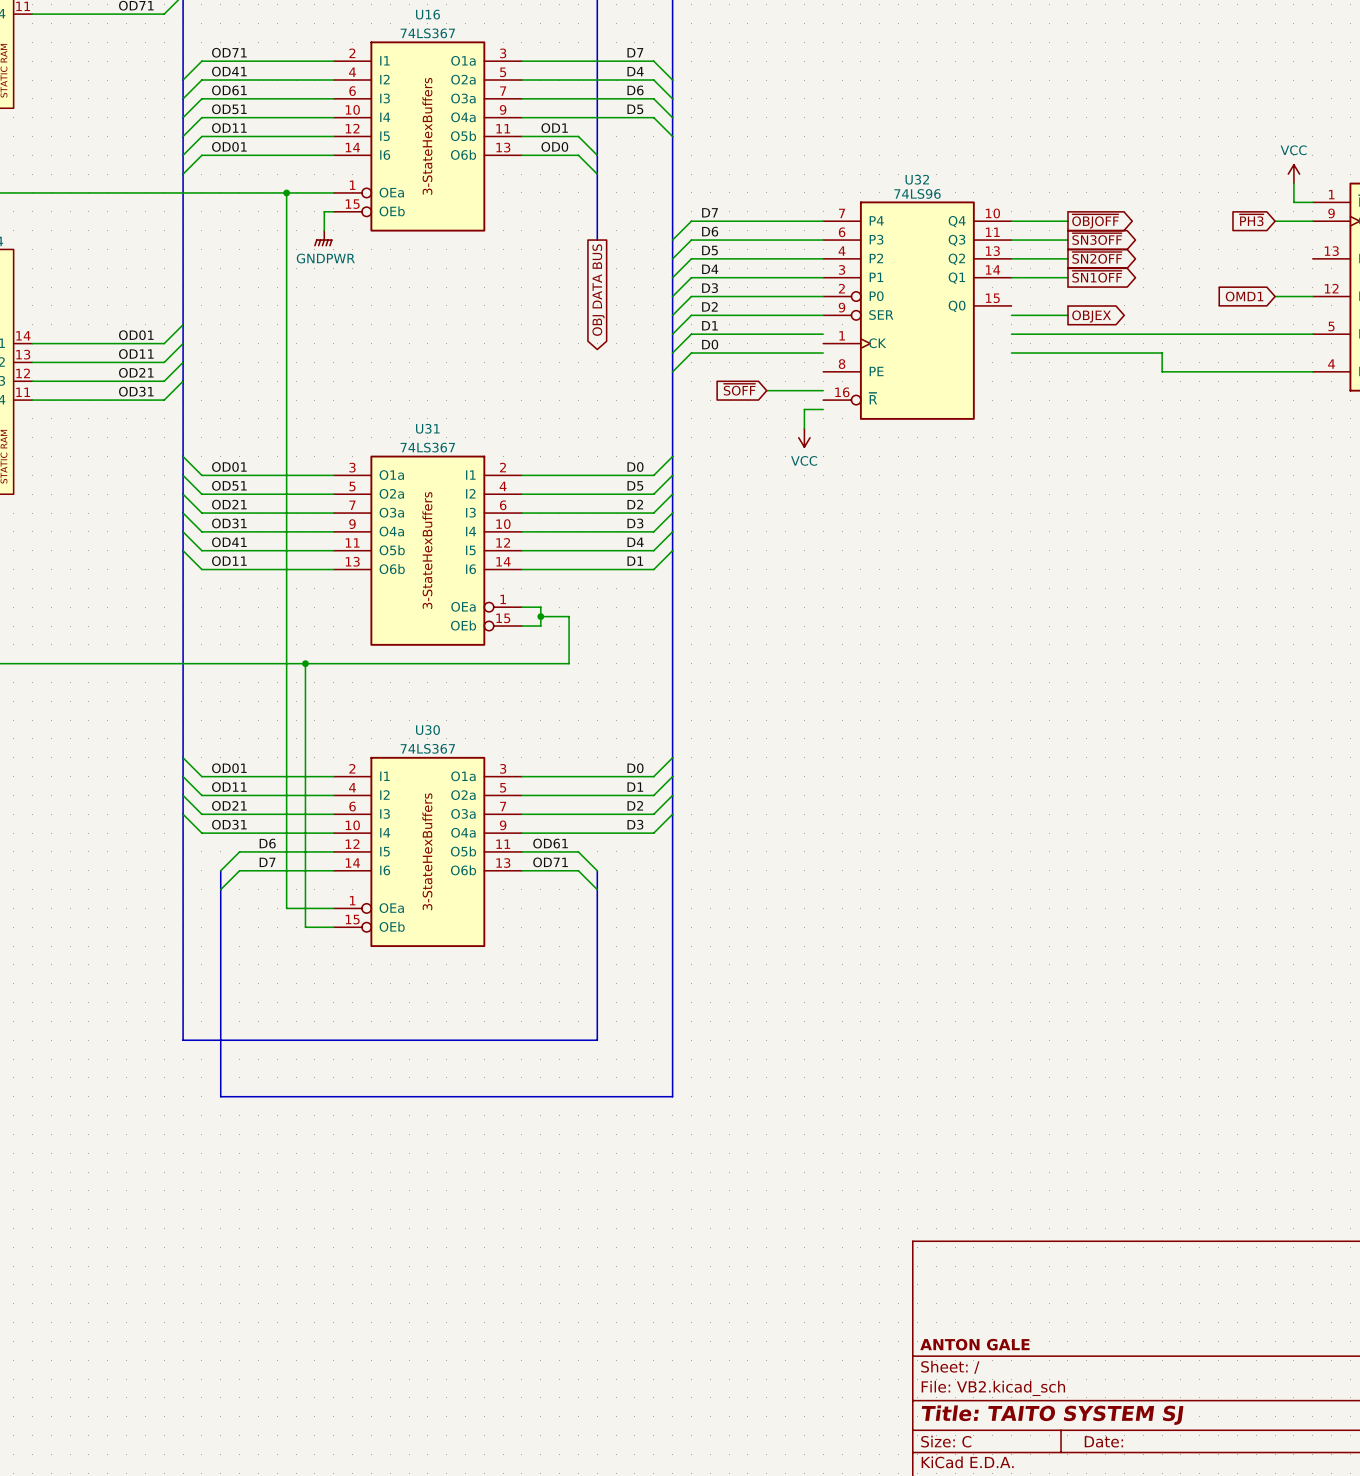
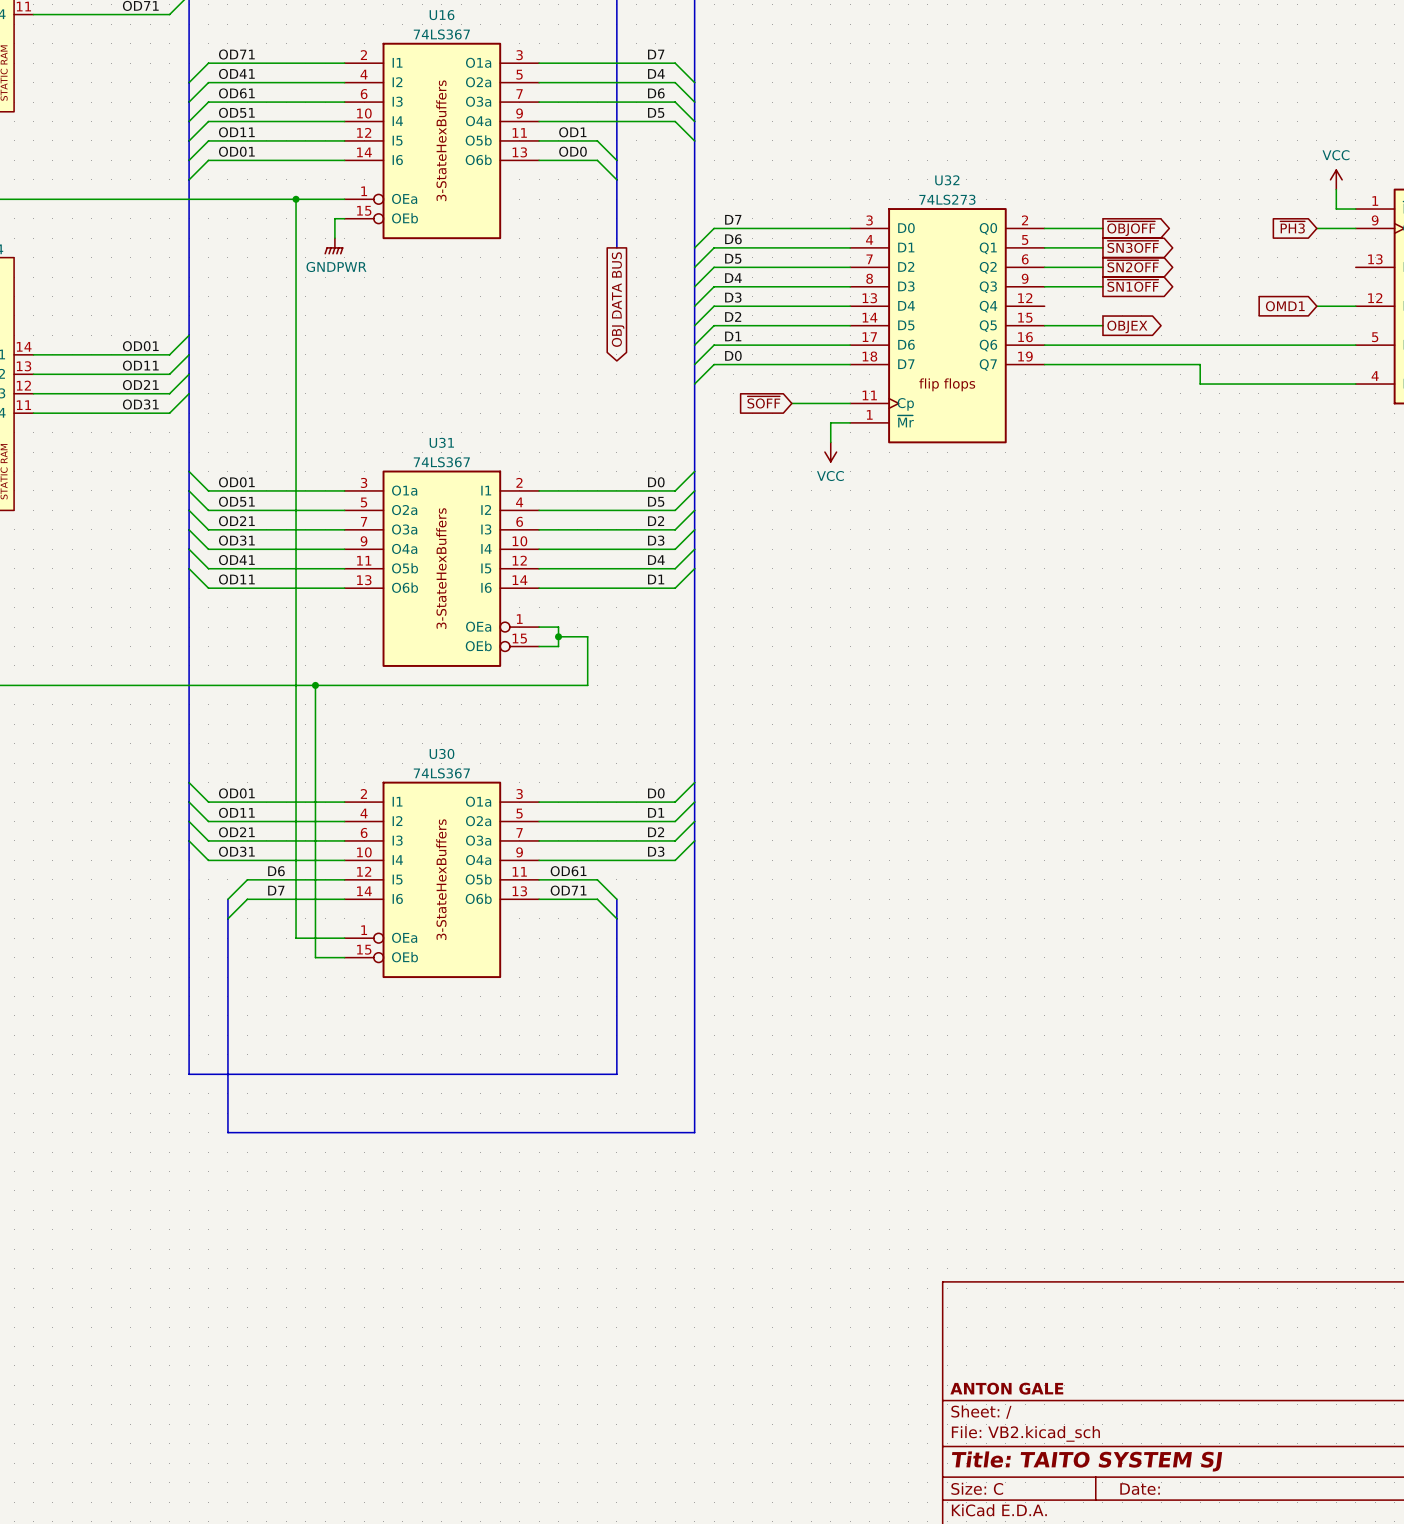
U32 value: 74LS96 (917, 193) -> 74LS273 (947, 199)
U32 symbol: [823, 201, 1012, 420] -> [850, 208, 1045, 444]

